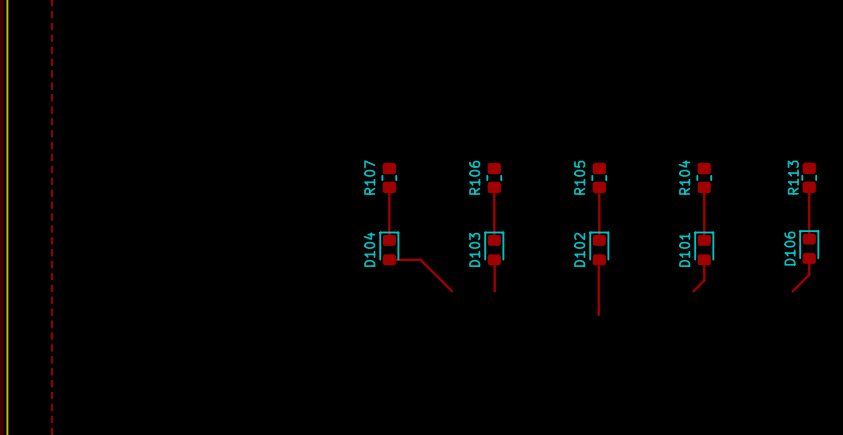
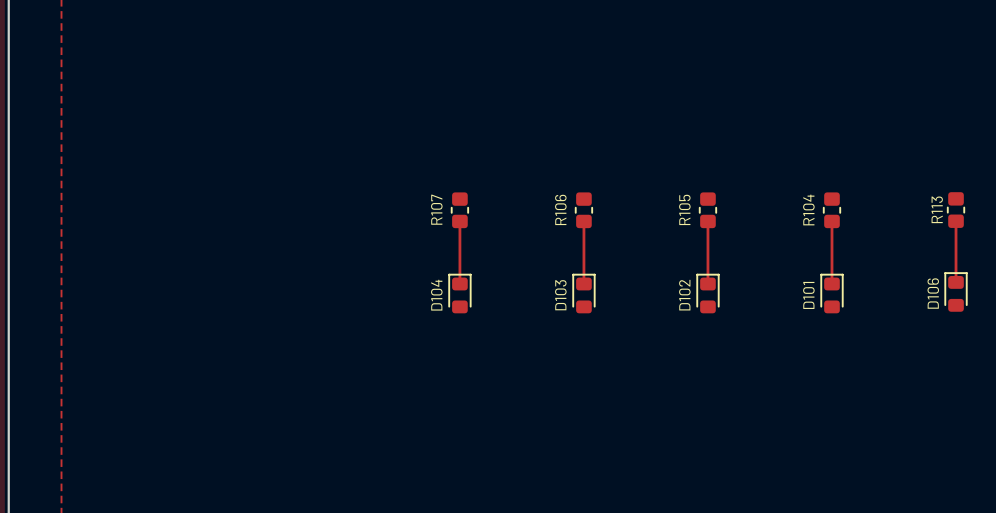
track: (809, 258) (809, 274) (792, 291) -> none
track: (389, 259) (420, 259) (452, 291) -> none
track: (496, 259) (494, 259) (494, 291) -> none
track: (705, 259) (704, 280) (693, 291) -> none
track: (599, 260) (598, 315) -> none

